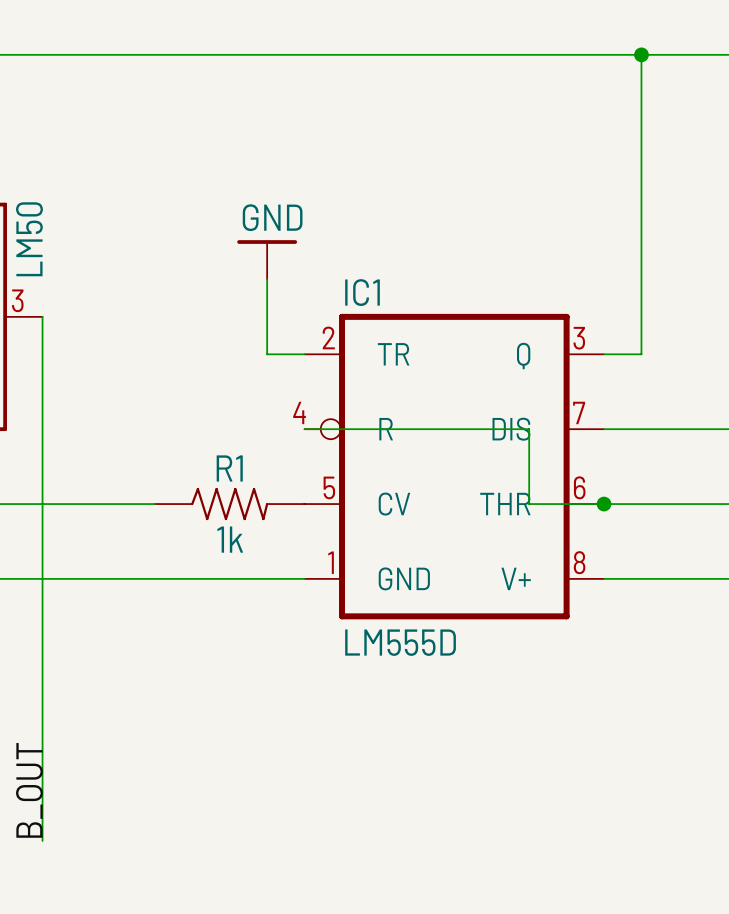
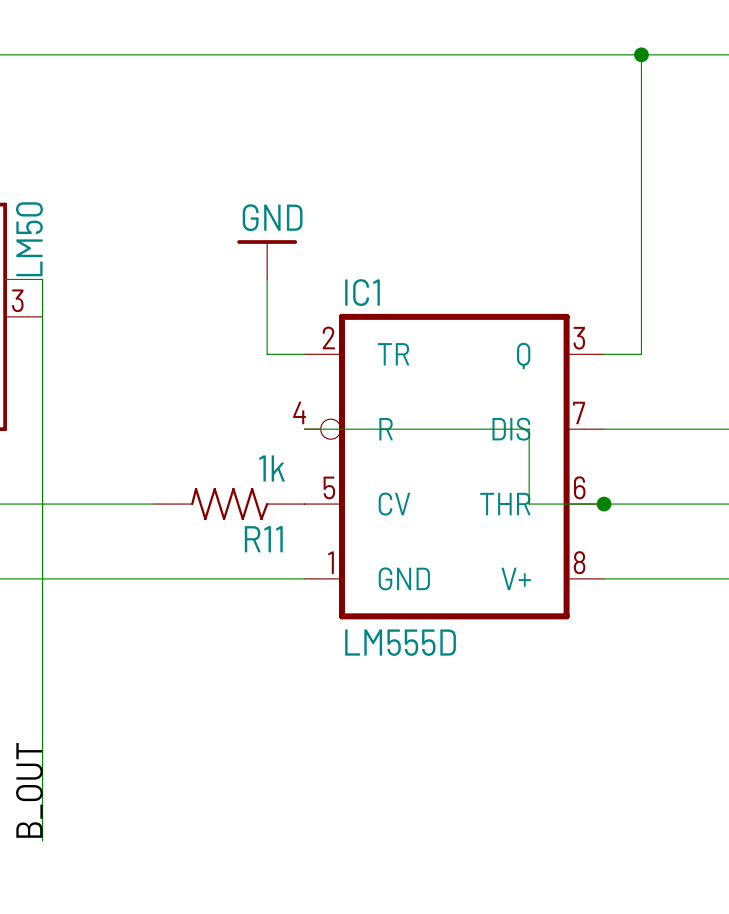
wire: none -> (5, 279) (42, 279) (42, 316)
R1: 1k (229, 504) -> none
R11: none -> 1k (229, 504)

